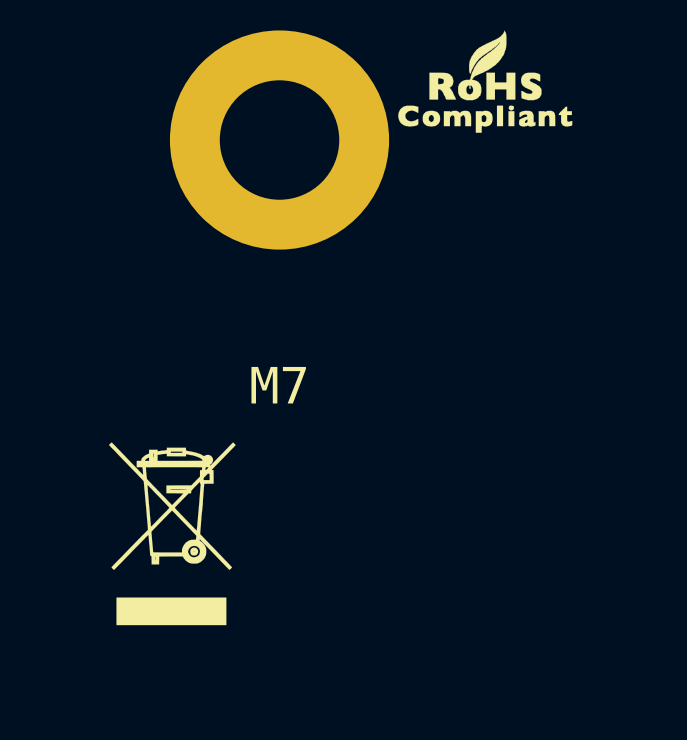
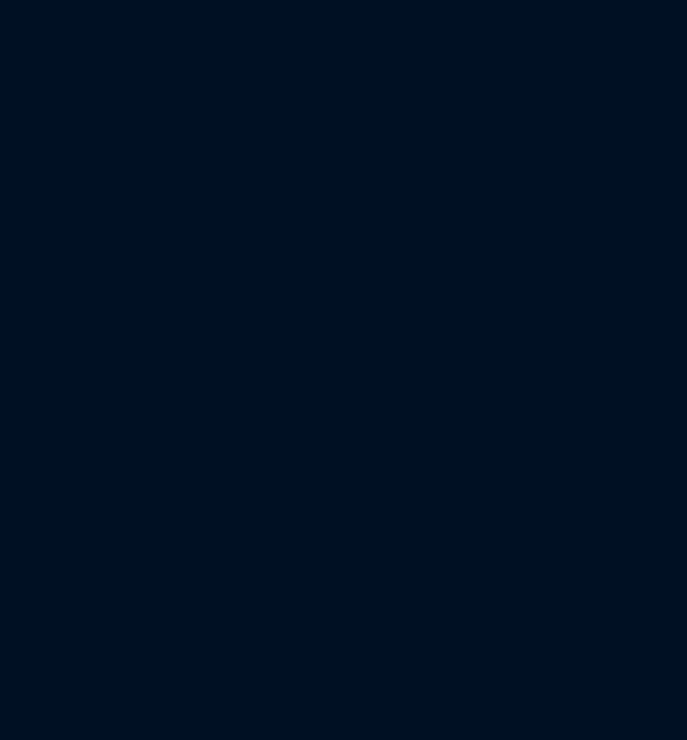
drawing: [398, 30, 573, 133] -> none
M7: (279, 140) -> none
drawing: [108, 442, 236, 626] -> none

